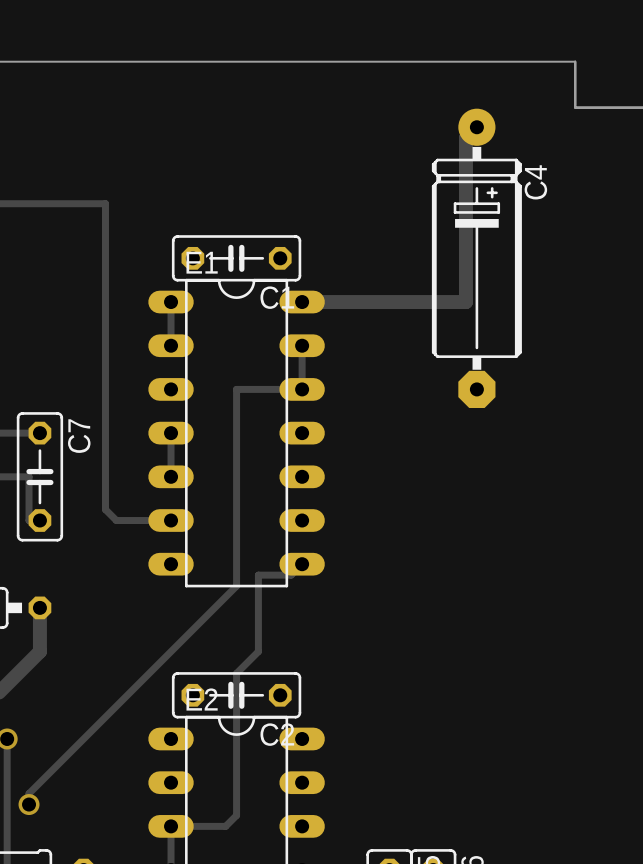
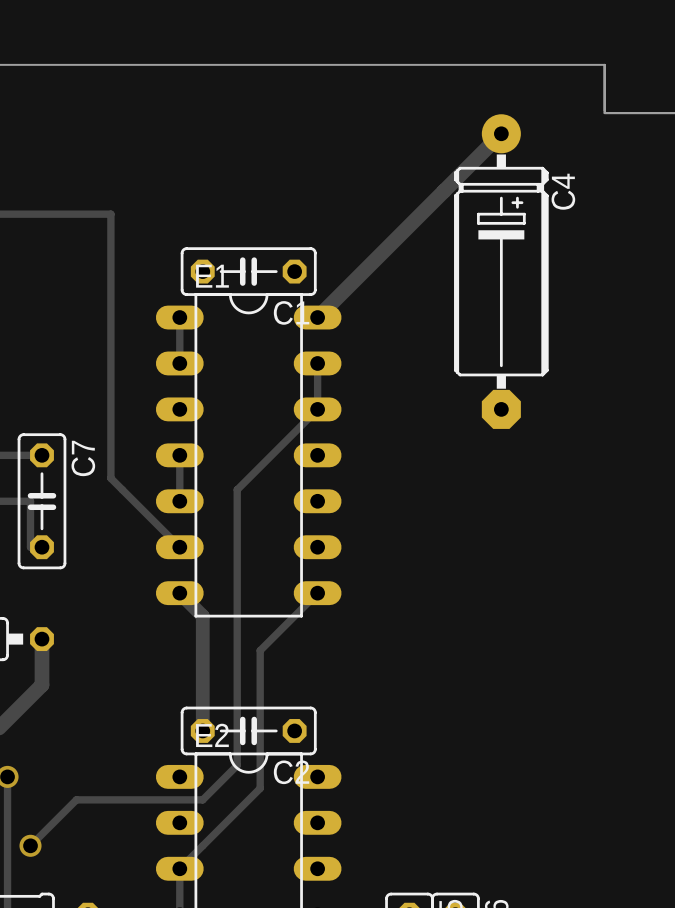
track: (465, 138) (465, 302) (302, 302) -> (489, 145) (317, 317)
track: (302, 389) (236, 389) (236, 586) (29, 793) (29, 804) -> (317, 409) (237, 489) (237, 765) (202, 799) (76, 799) (30, 845)
track: (105, 454) (105, 509) (116, 520) (171, 520) -> (110, 478) (179, 547)
track: none -> (179, 593) (202, 616) (202, 730)
track: (291, 575) (258, 575) (258, 651) (236, 673) (236, 815) (225, 826) (171, 826) -> (306, 604) (260, 650) (260, 788) (179, 868)

